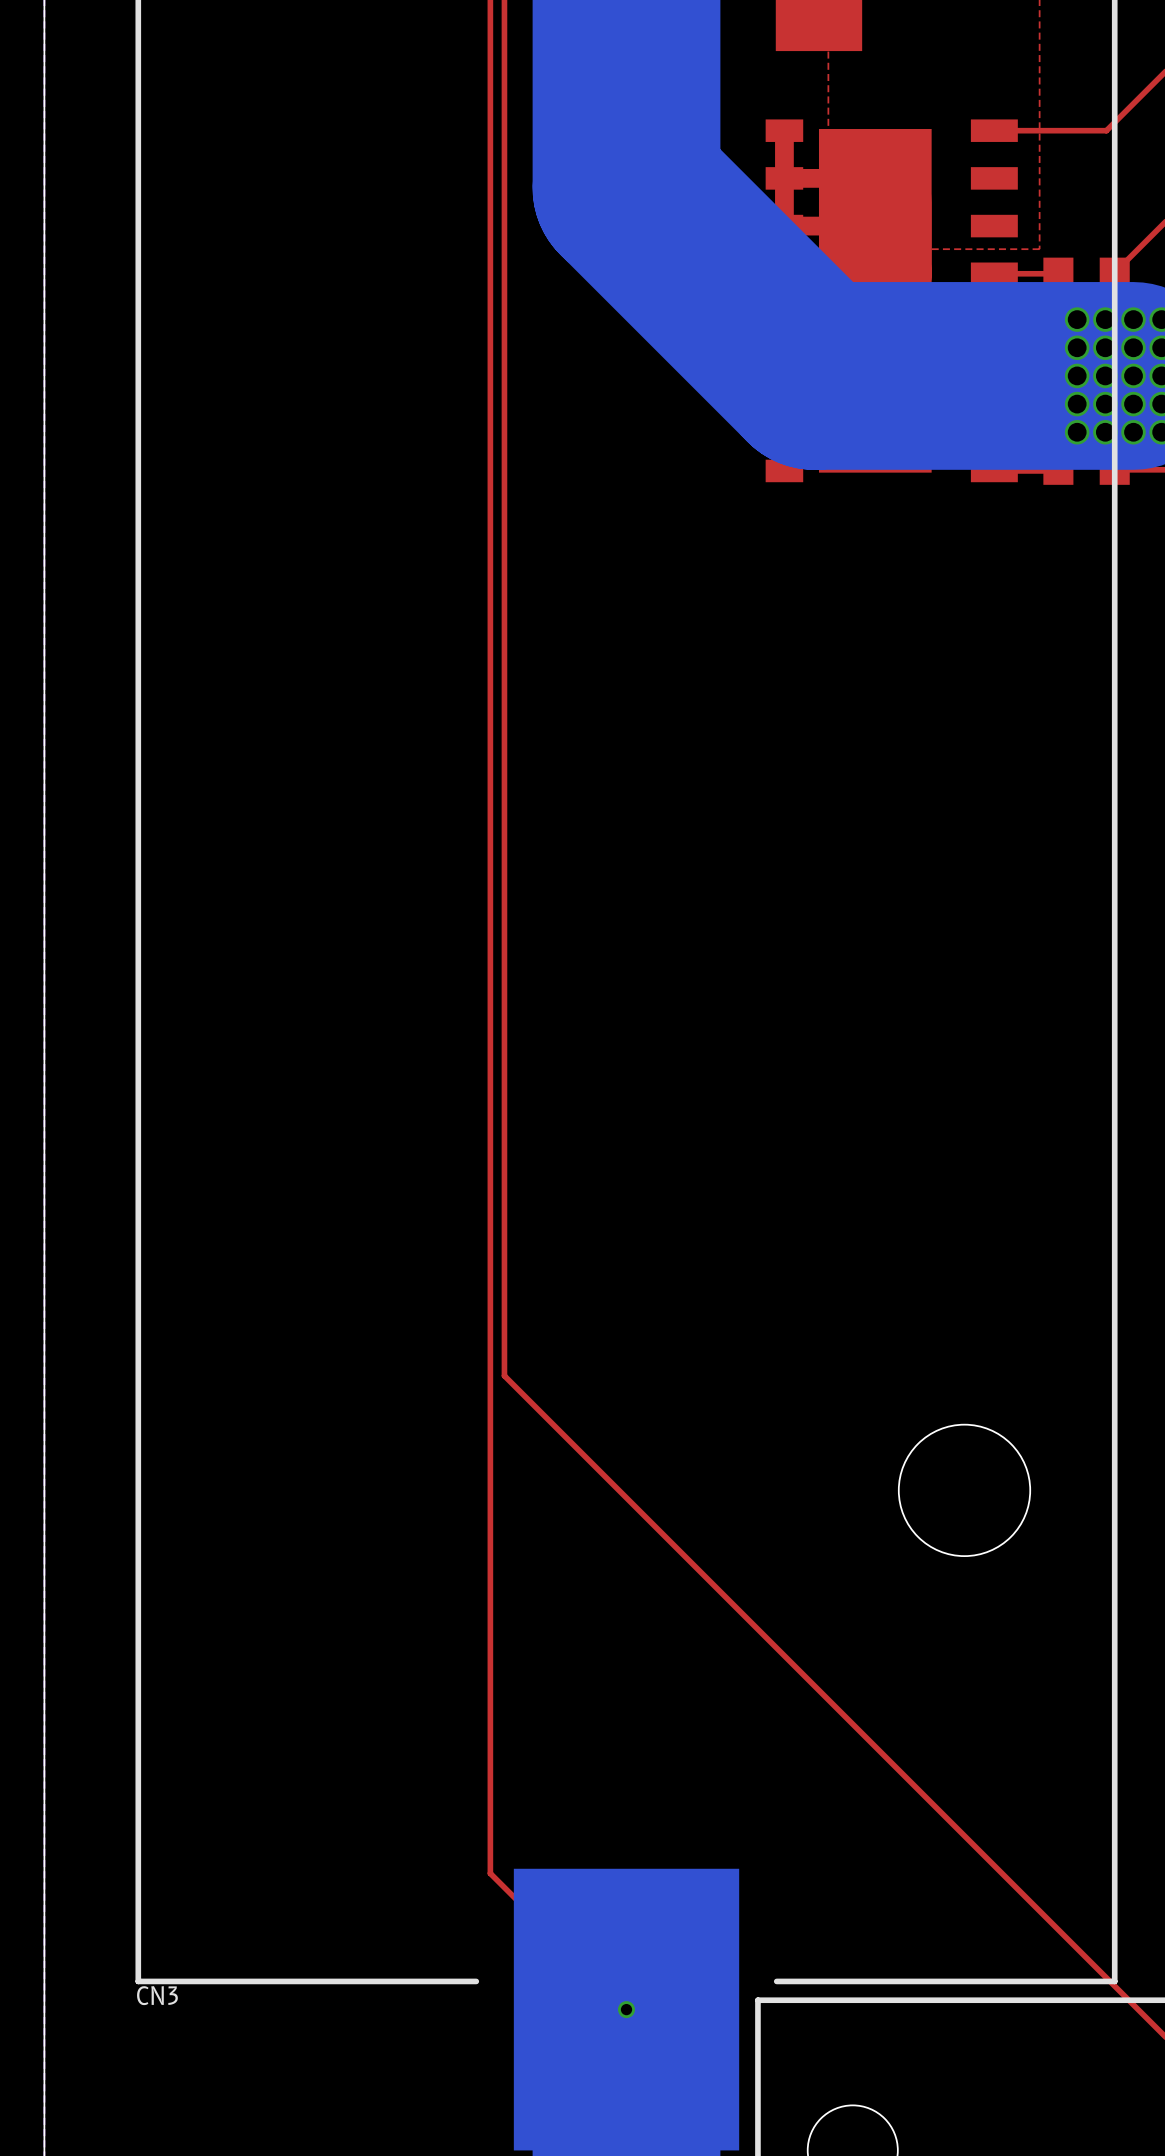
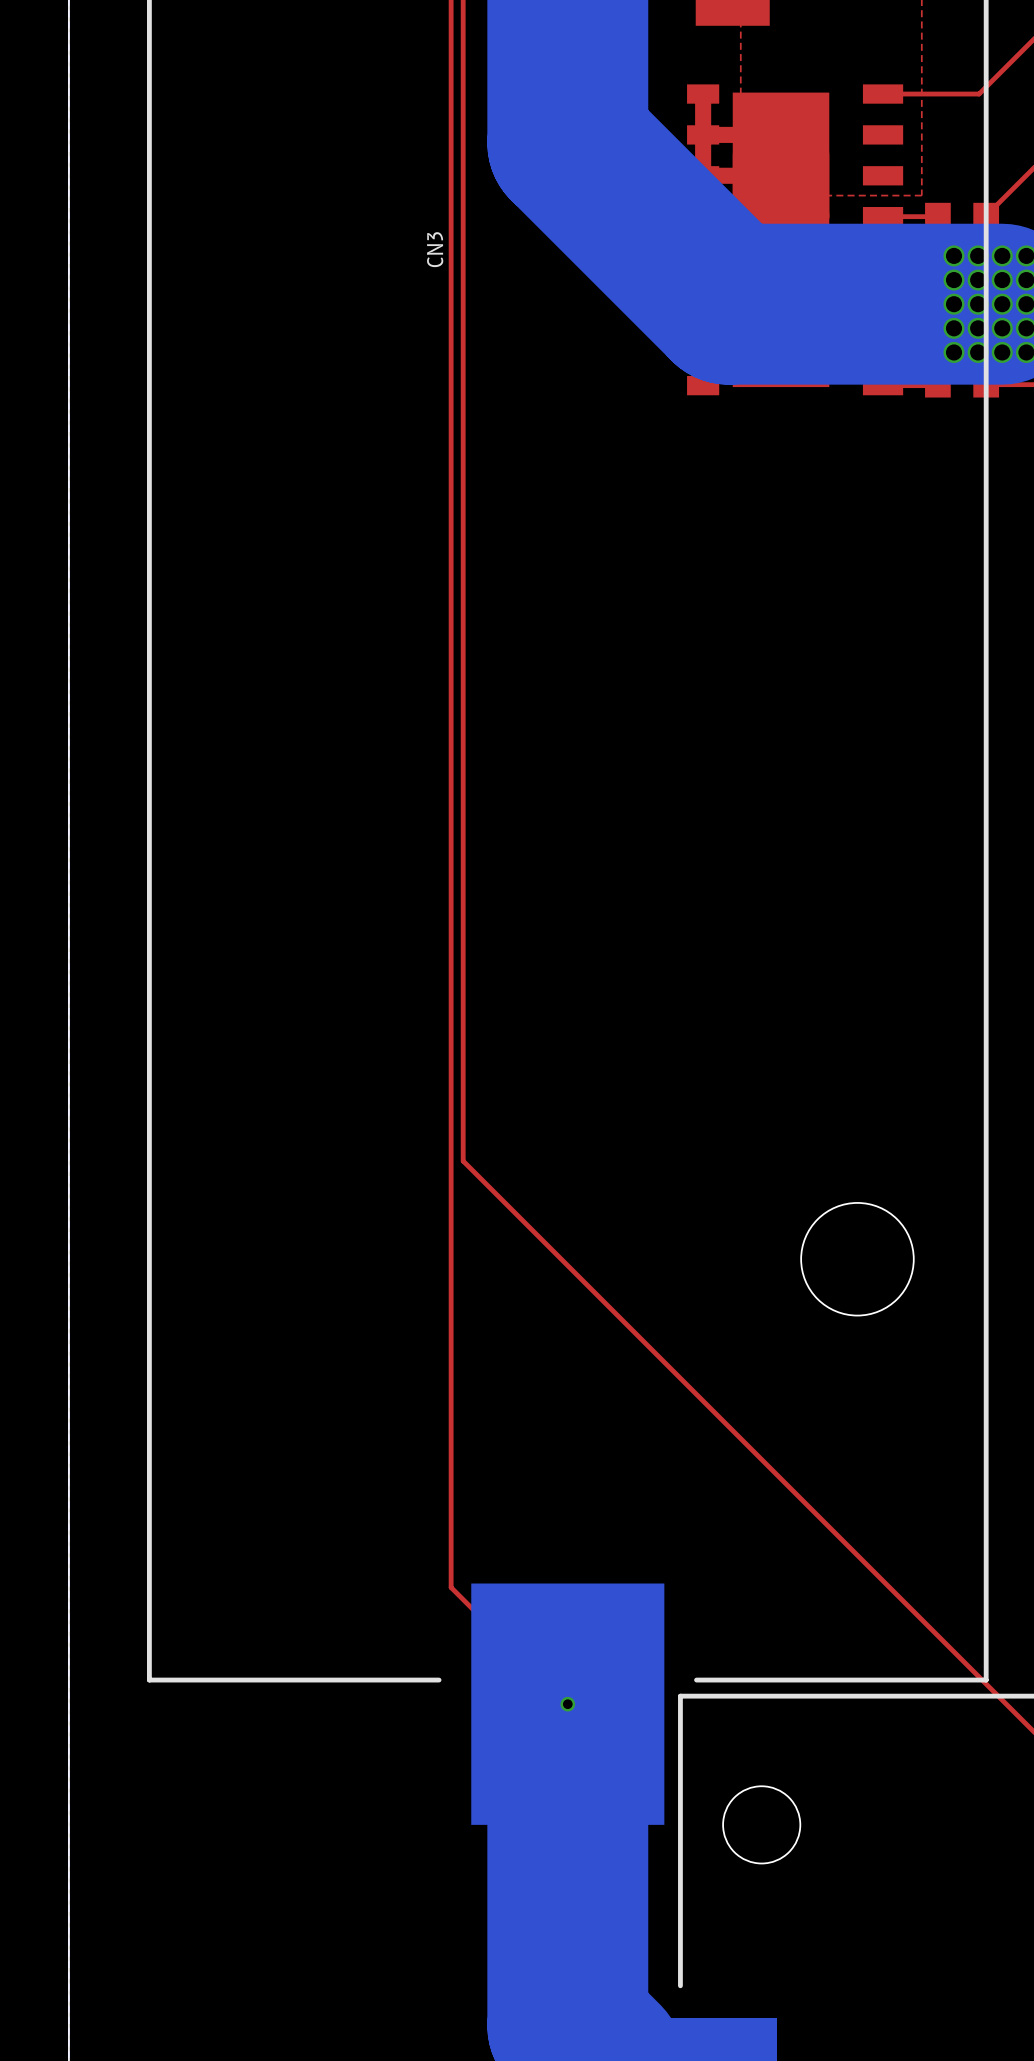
CN3 name rotation: 0° (157, 1995) -> 90° counterclockwise (435, 249)
CN3 name position: CN3 (157, 1995) -> CN3 (435, 249)

